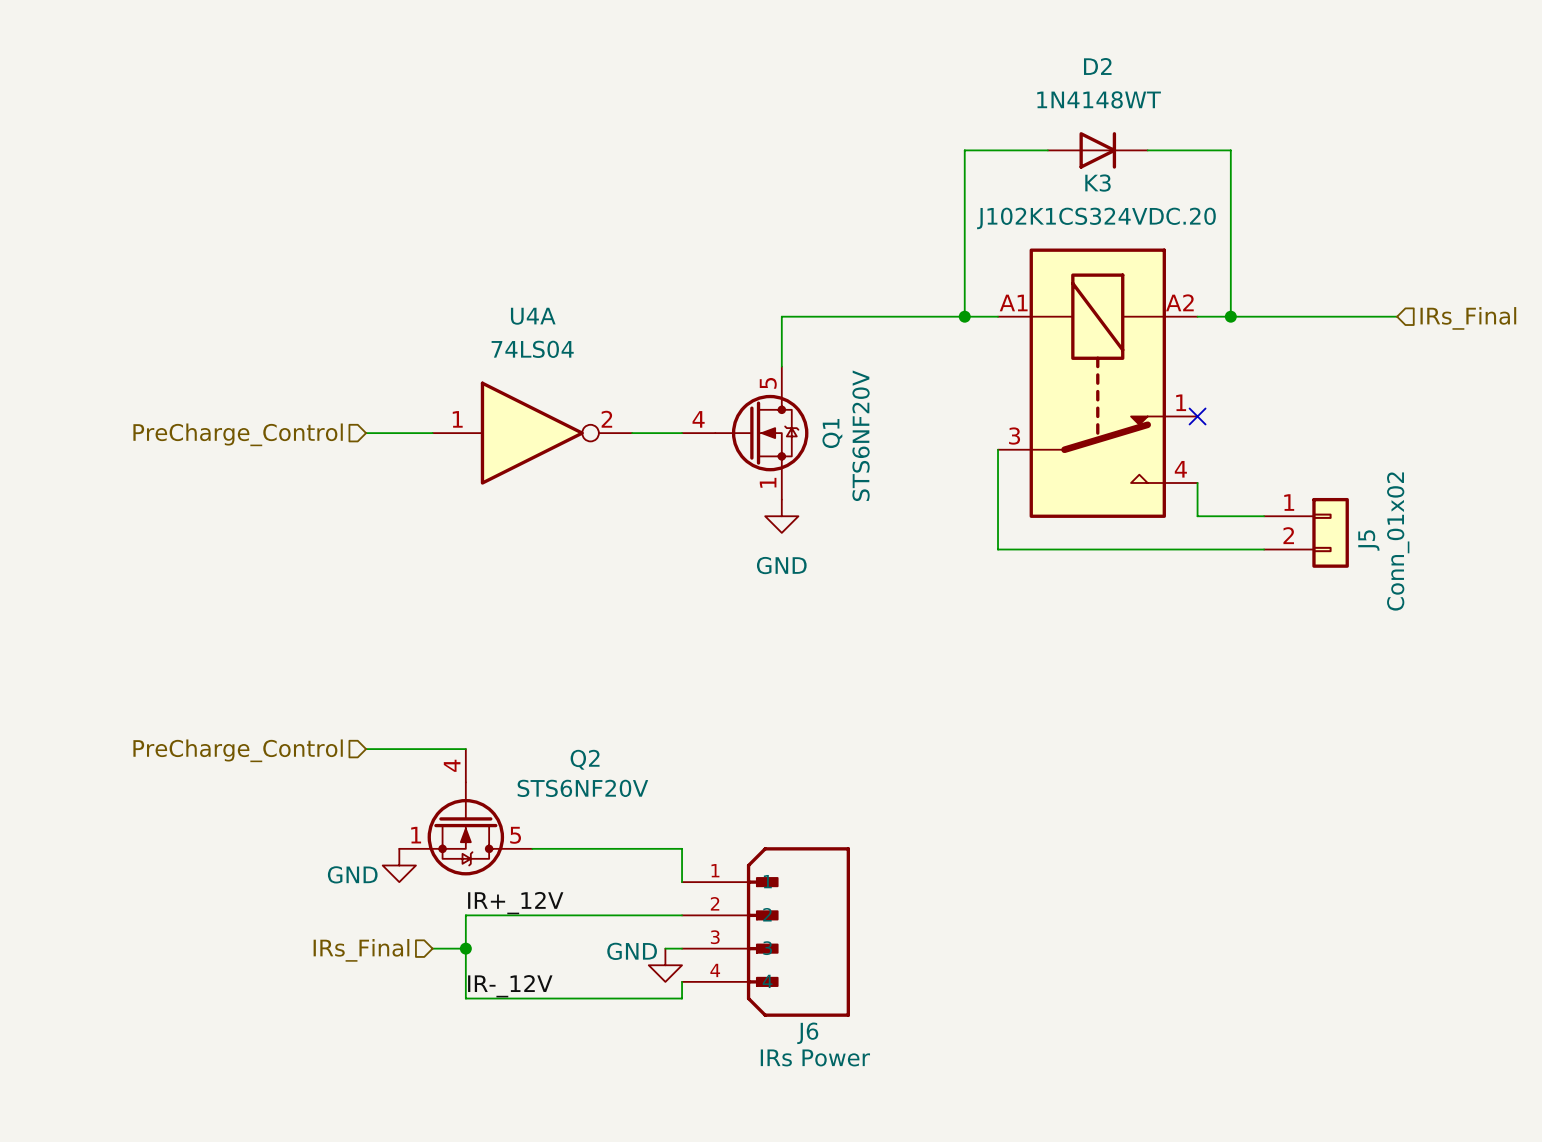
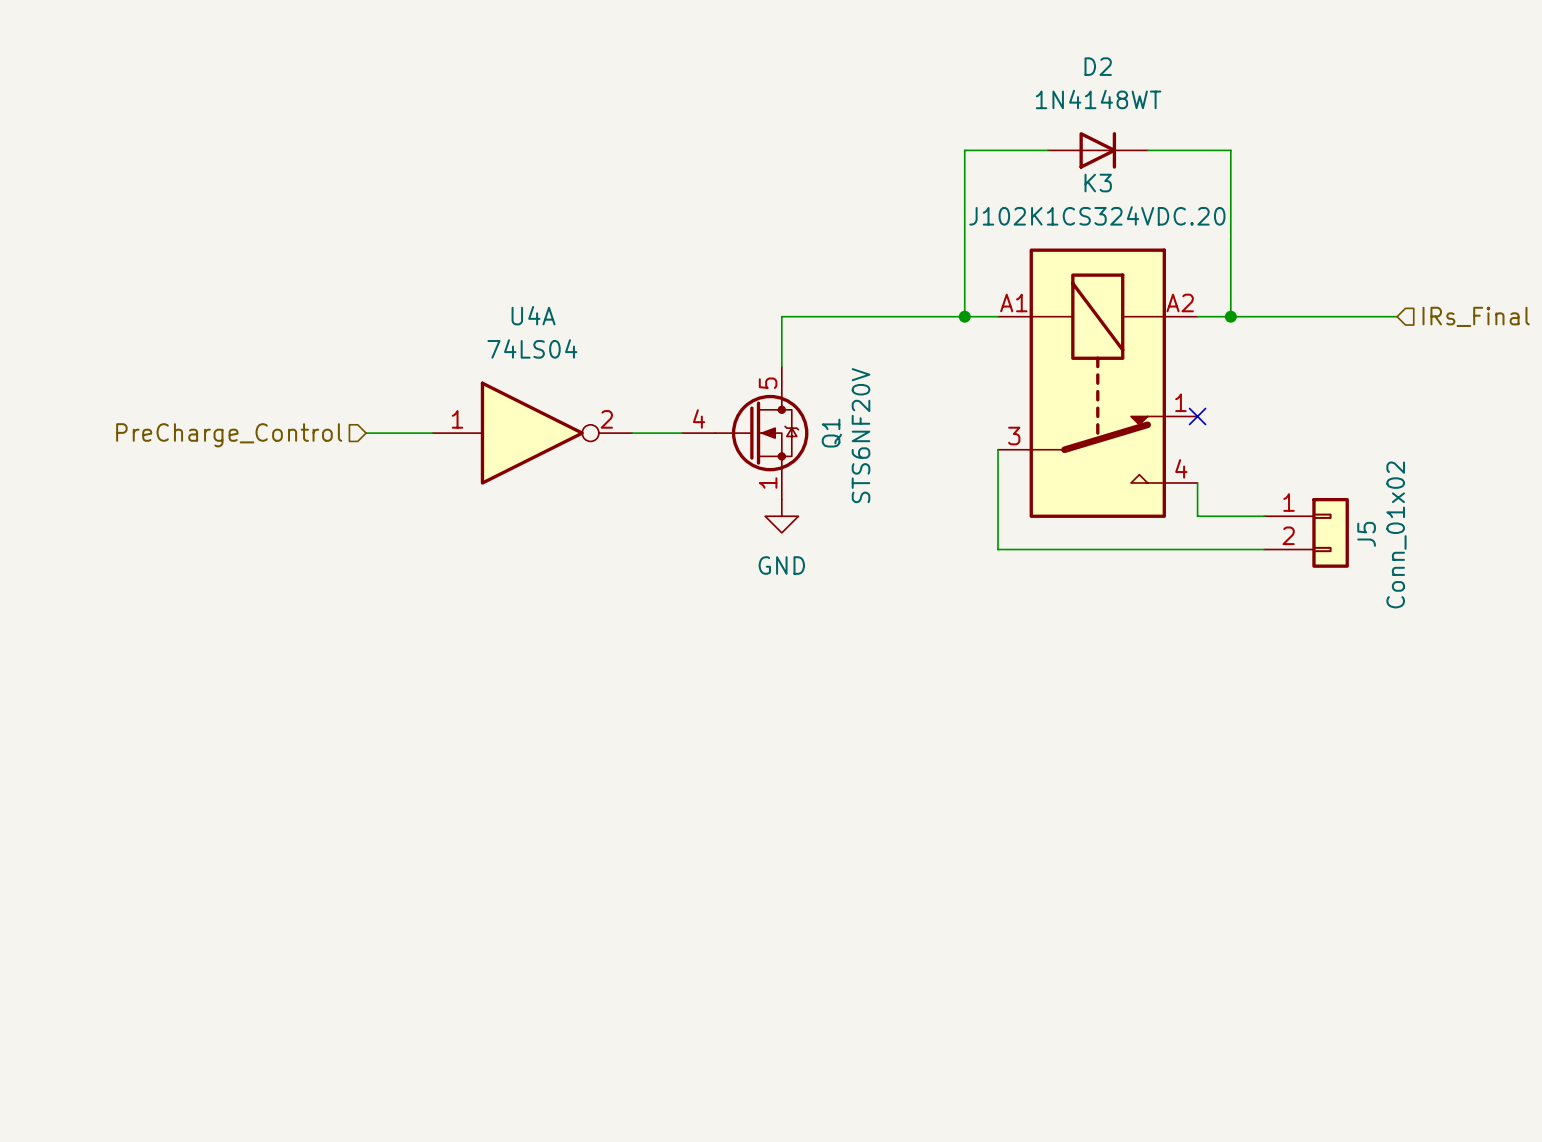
wire: (366, 749) (465, 749) -> none
hierarchical label: PreCharge_Control (238, 750) -> none
Q2: STS6NF20V (465, 812) -> none
wire: (532, 848) (682, 848) (682, 882) -> none
power symbol: GND (399, 865) -> none
label: IR+_12V (515, 903) -> none
wire: (682, 915) (465, 915) (465, 998) (682, 998) (682, 981) -> none
J6: IRs Power (766, 932) -> none
wire: (432, 948) (465, 948) -> none
junction: (465, 948) -> none
wire: (665, 948) (682, 948) -> none
hierarchical label: IRs_Final (361, 950) -> none
power symbol: GND (665, 965) -> none
label: IR-_12V (510, 986) -> none

